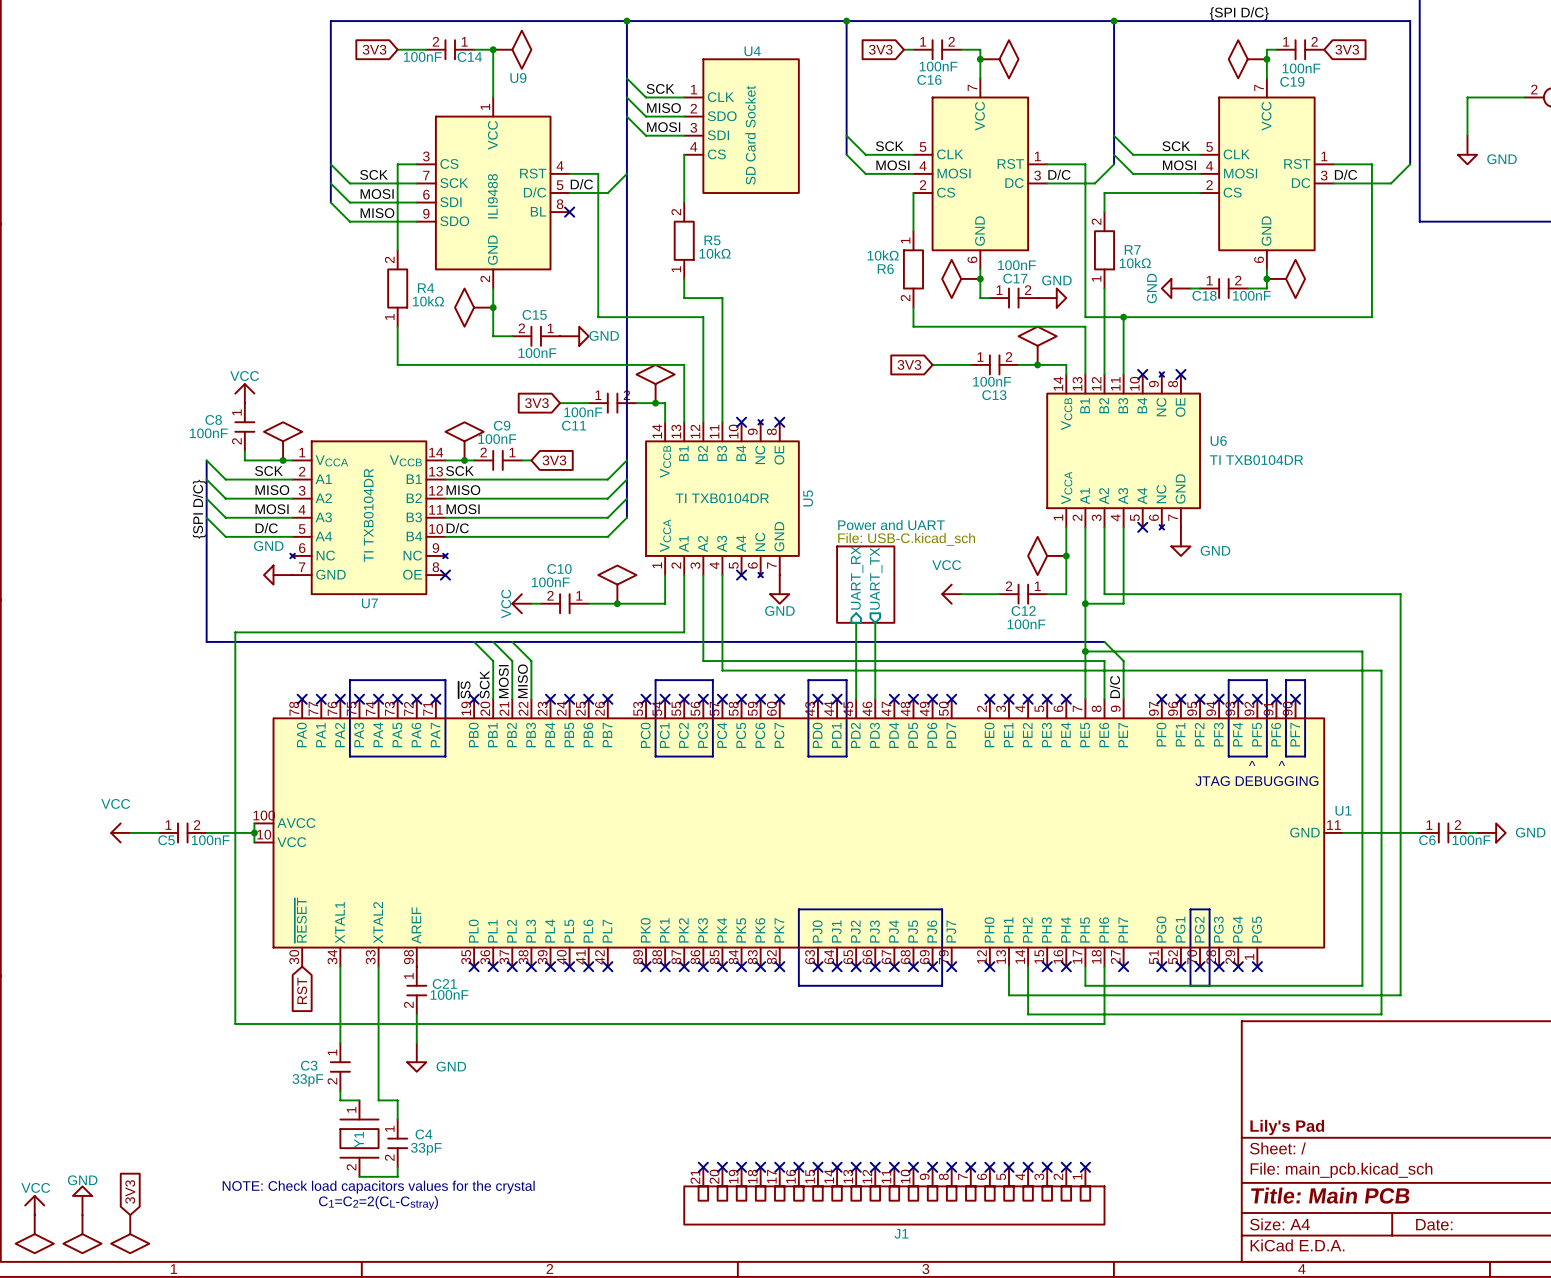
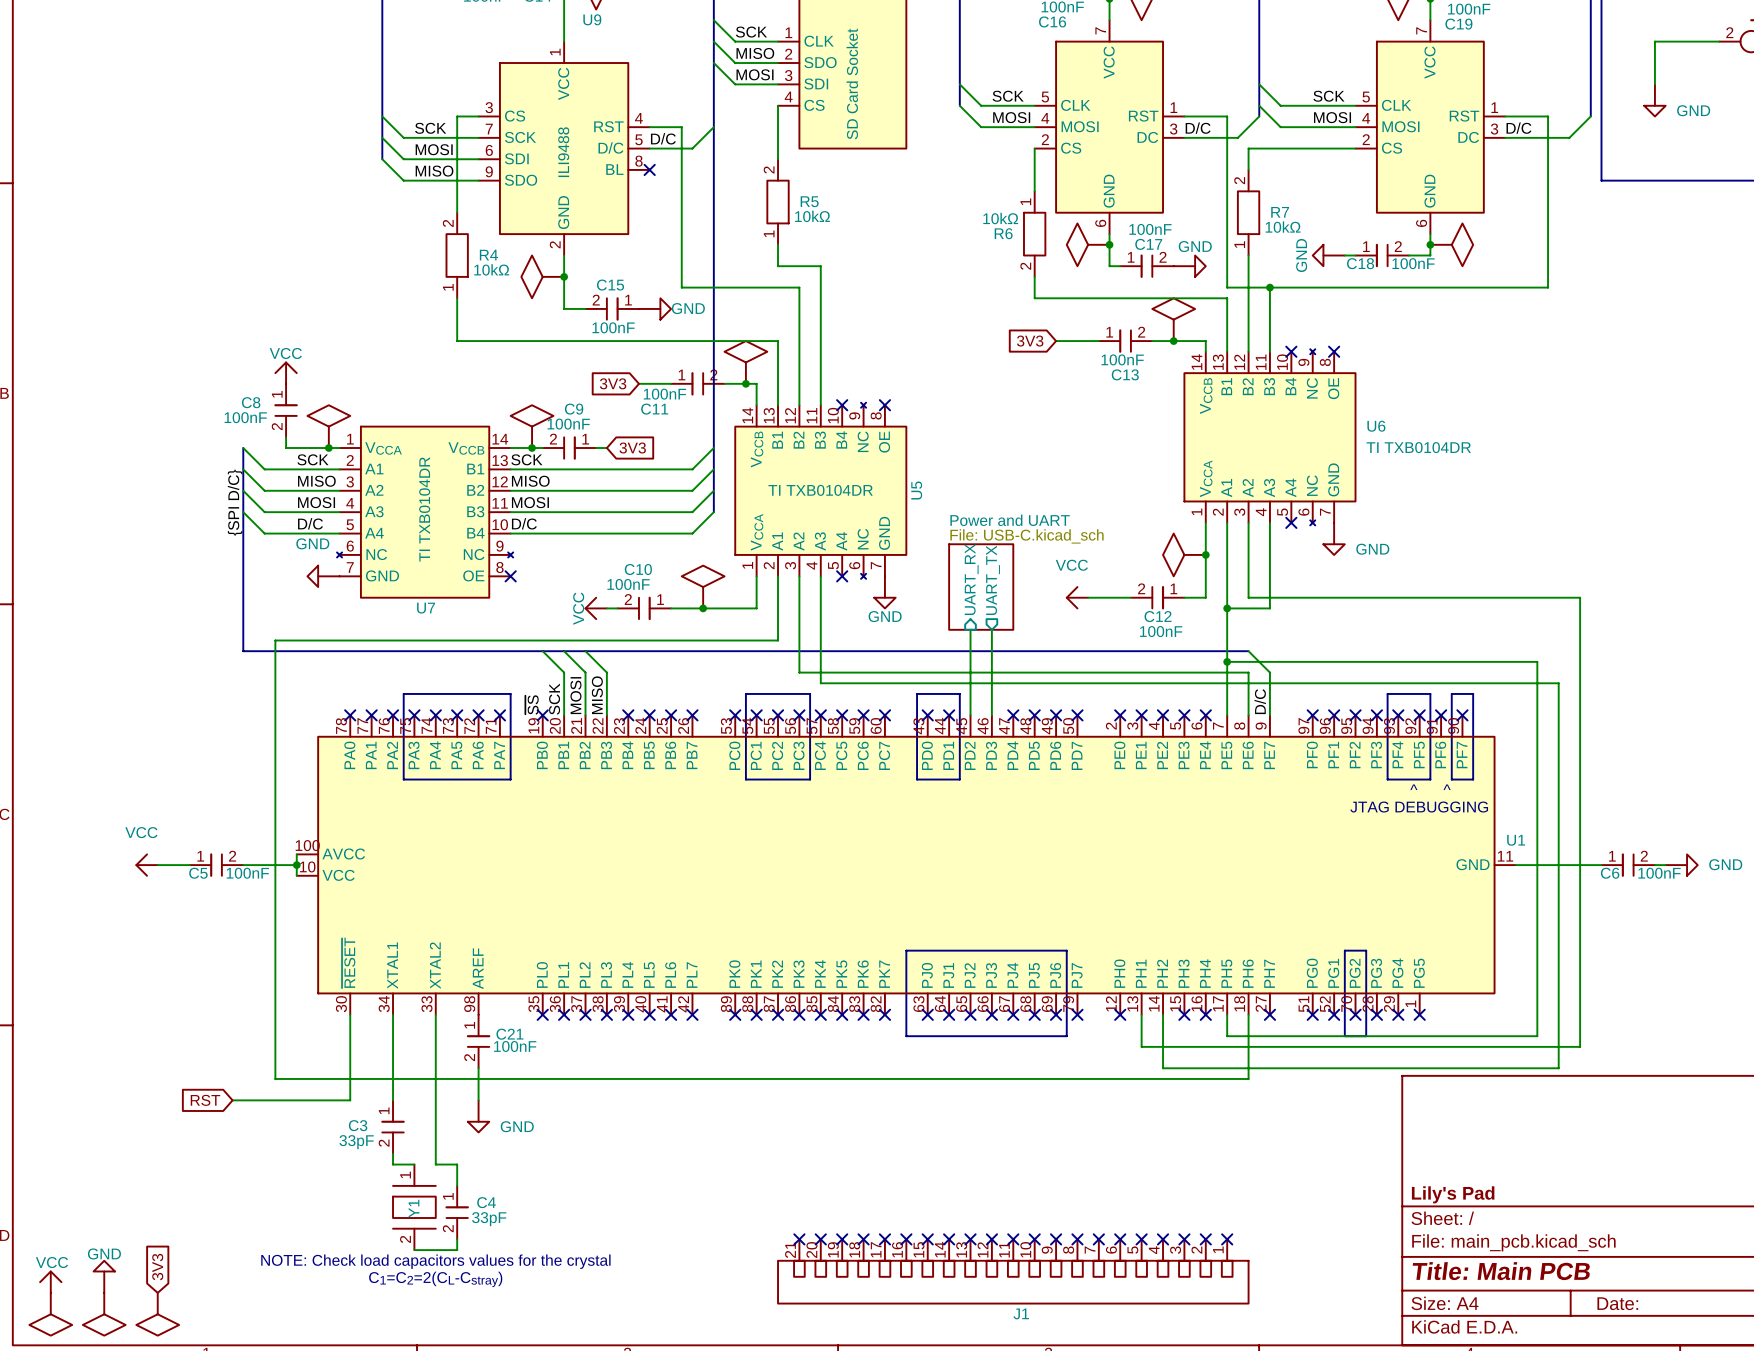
wire: none -> (350, 1014) (350, 1100) (232, 1100)
global label rotation: 0° (302, 990) -> 90° clockwise (205, 1100)
global label position: RST (302, 990) -> RST (205, 1100)

